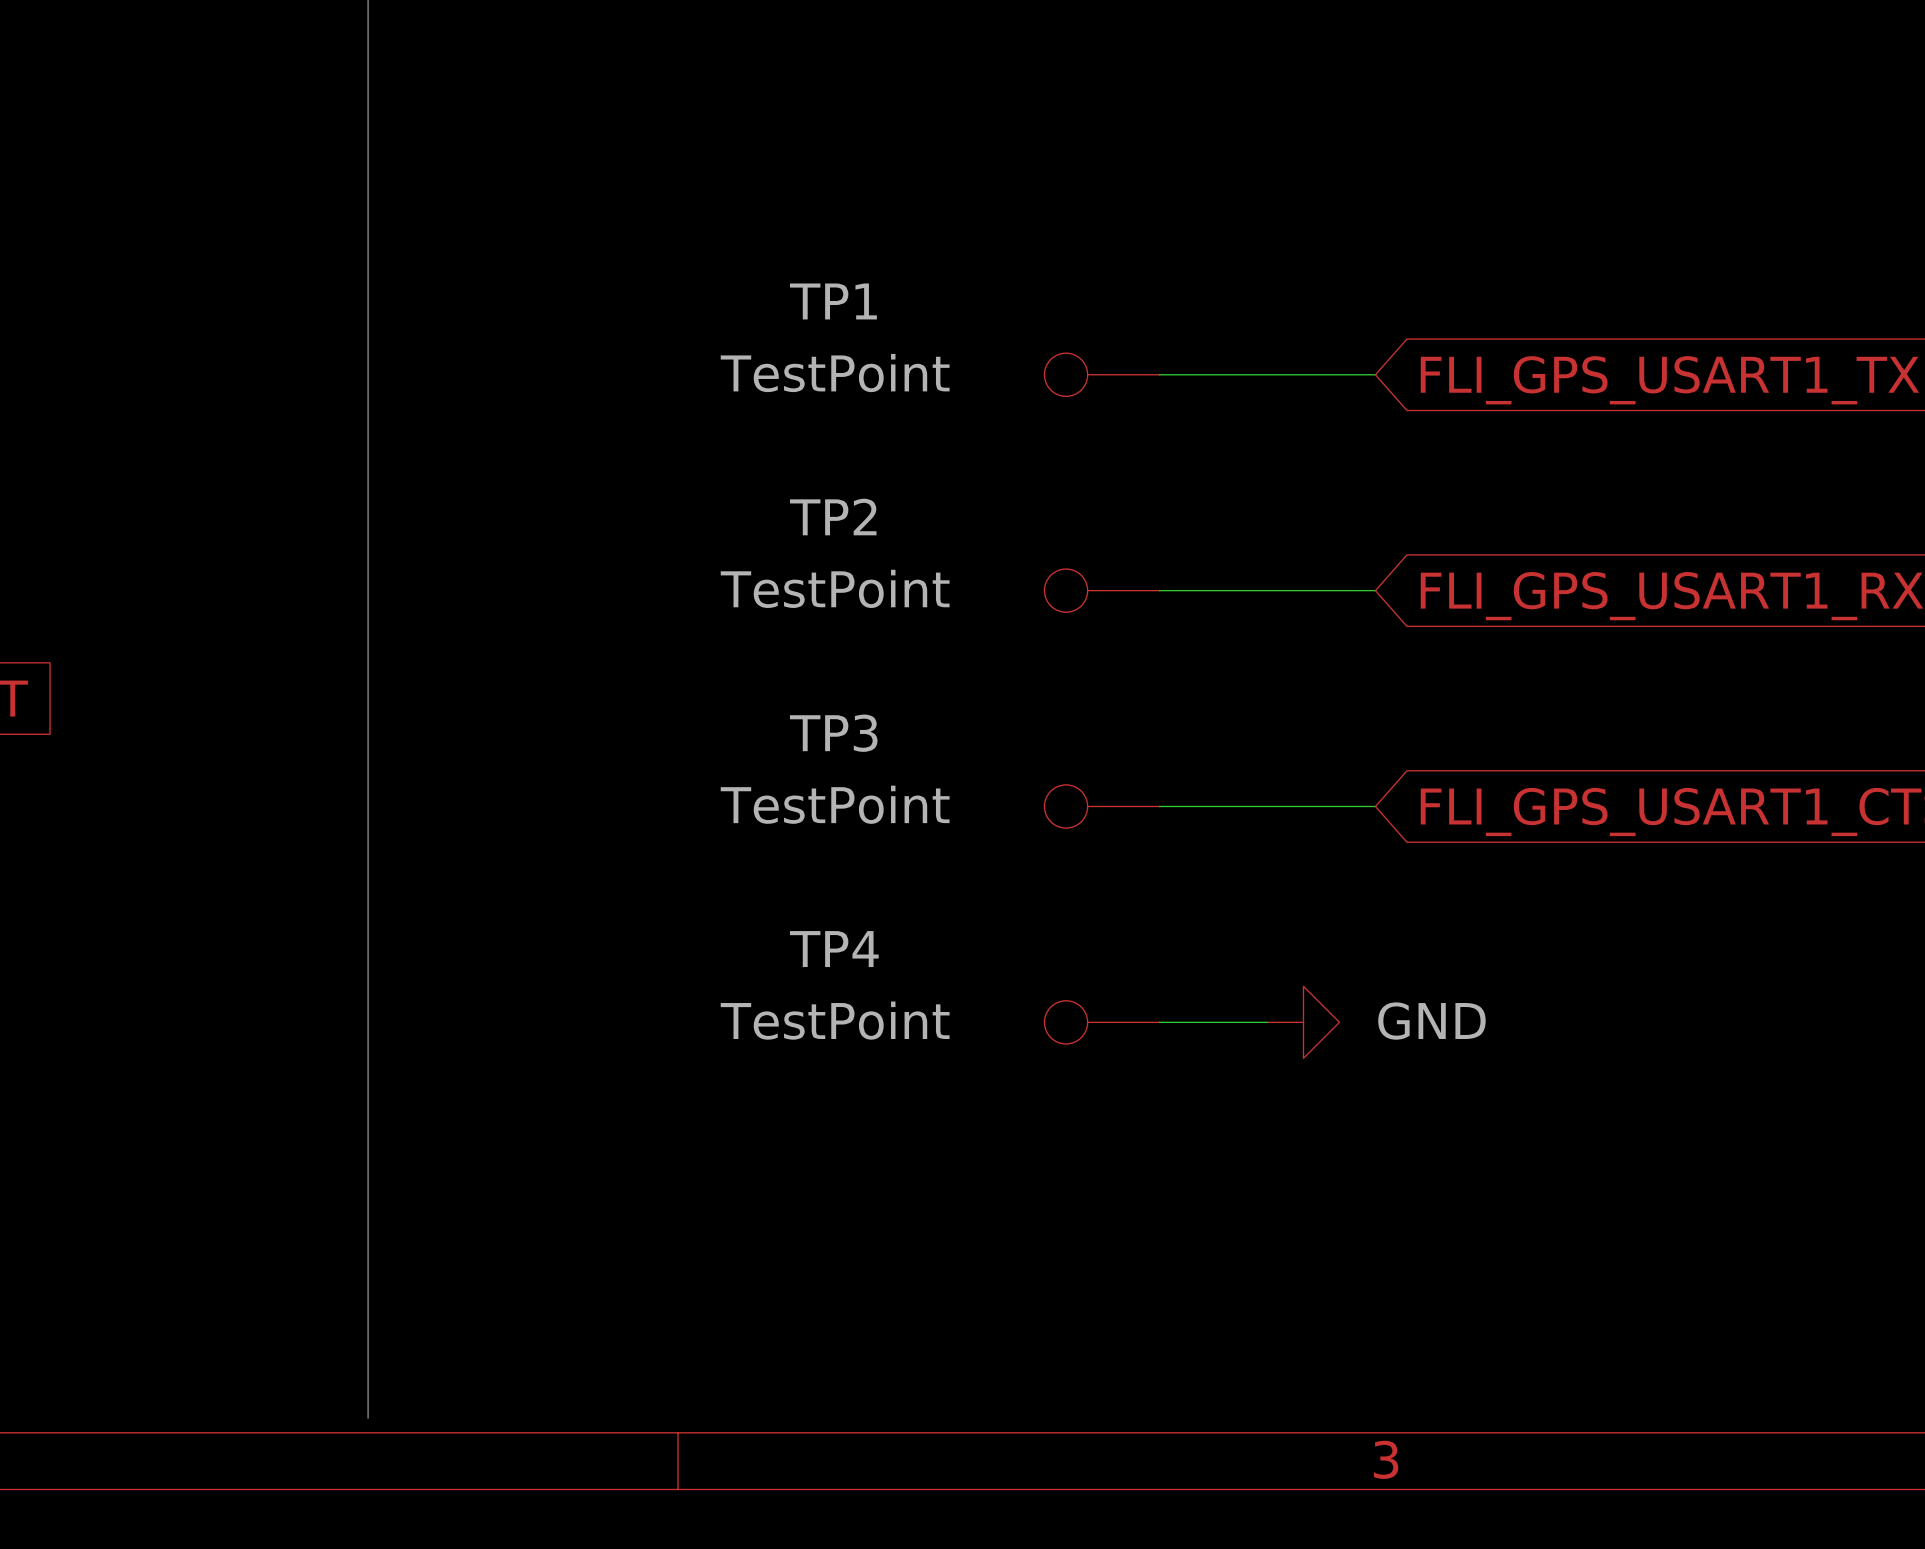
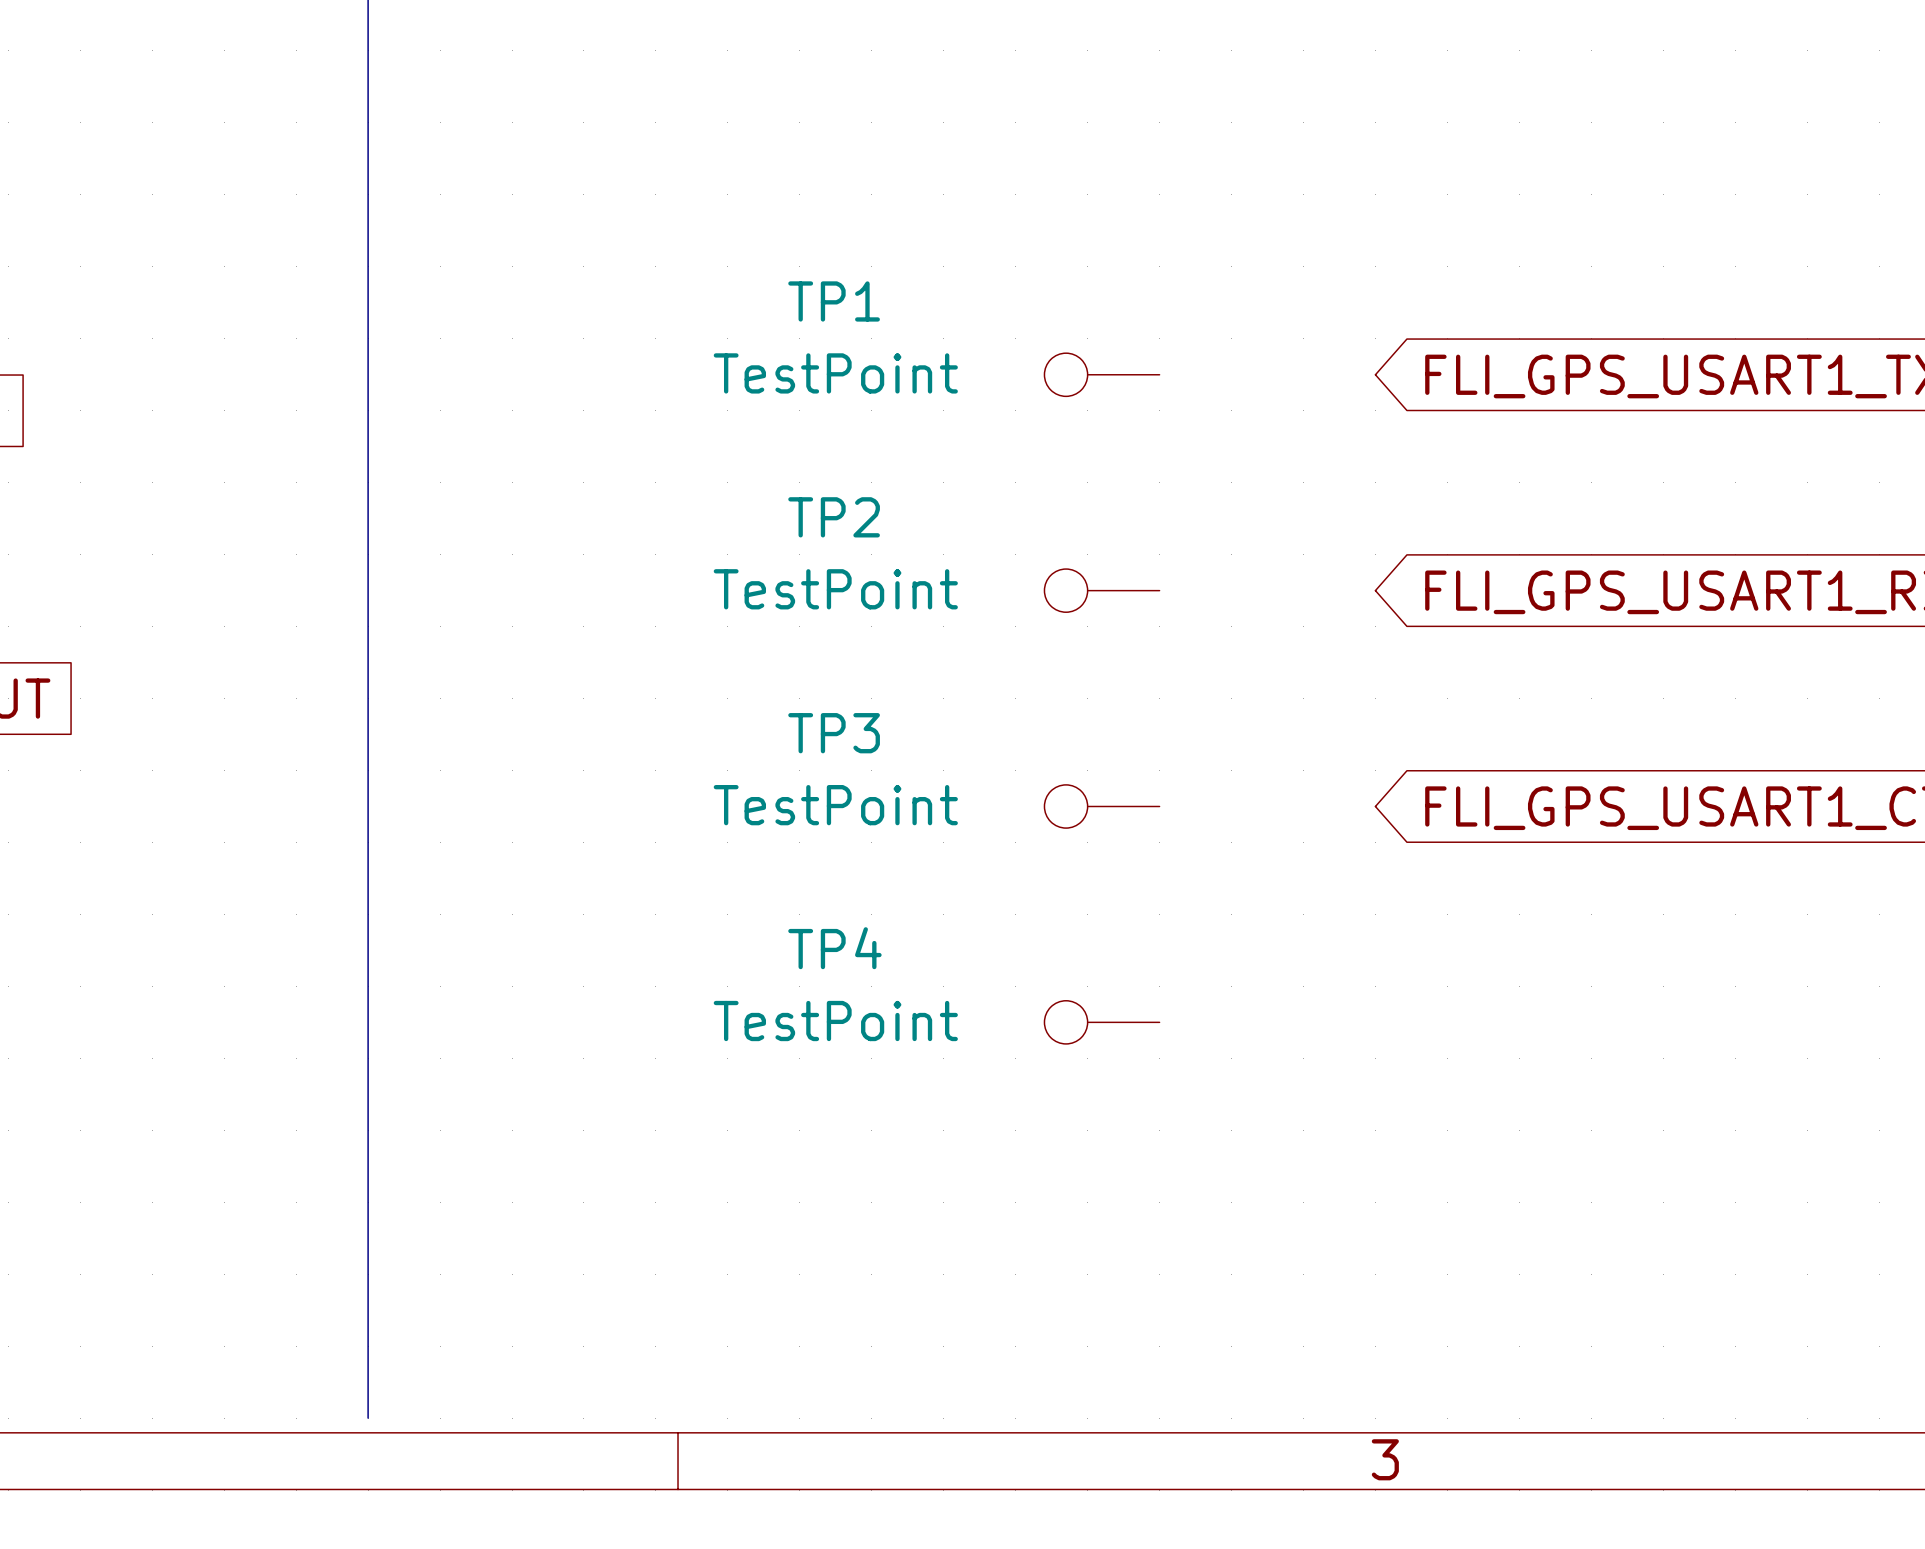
wire: (1159, 374) (1375, 374) -> none
wire: (1159, 590) (1375, 590) -> none
wire: (1159, 806) (1375, 806) -> none
wire: (1159, 1022) (1267, 1022) -> none
power symbol: GND (1303, 1022) -> none

